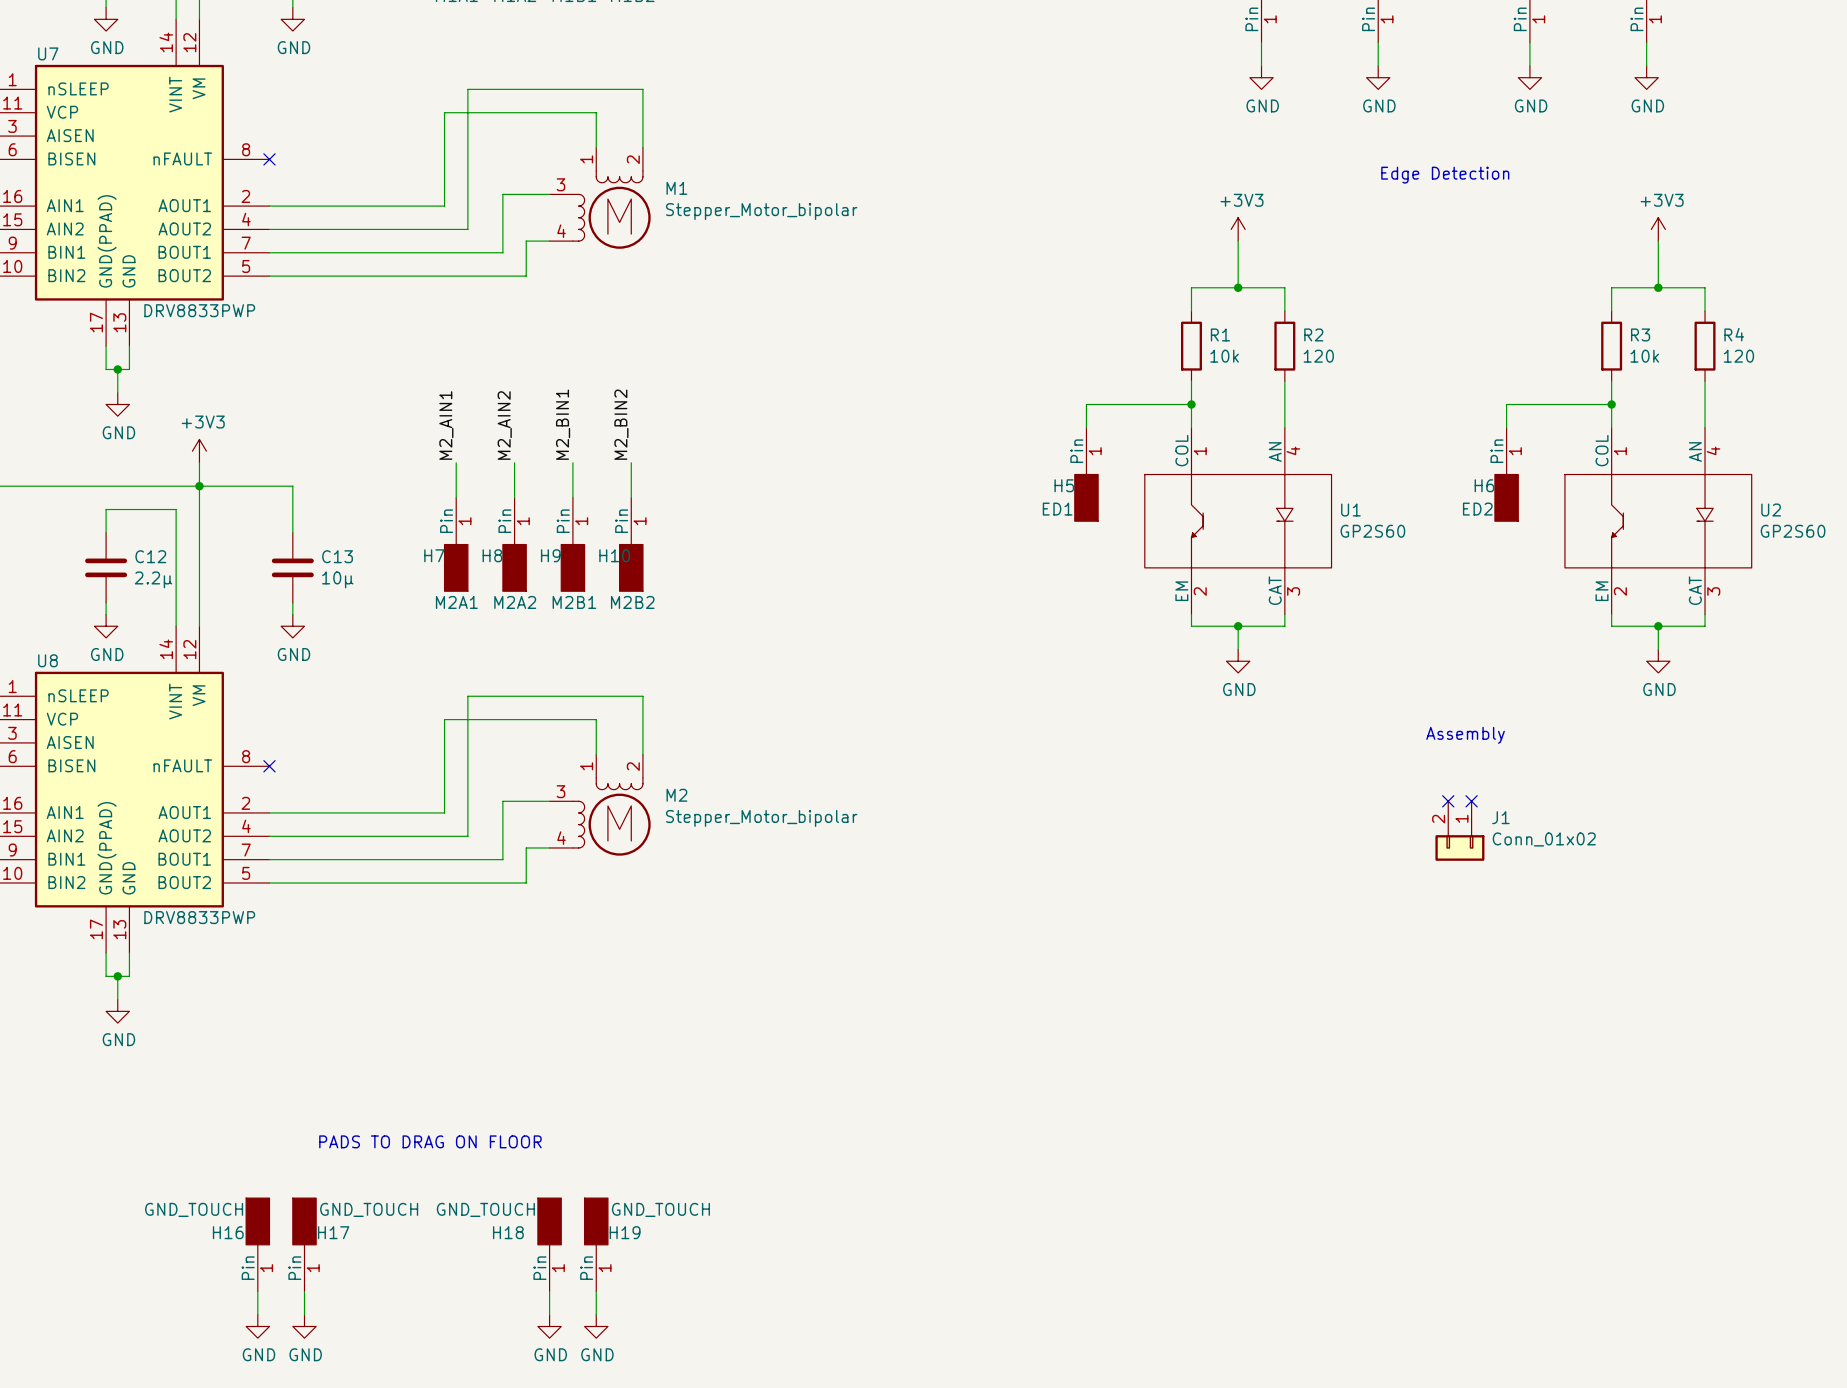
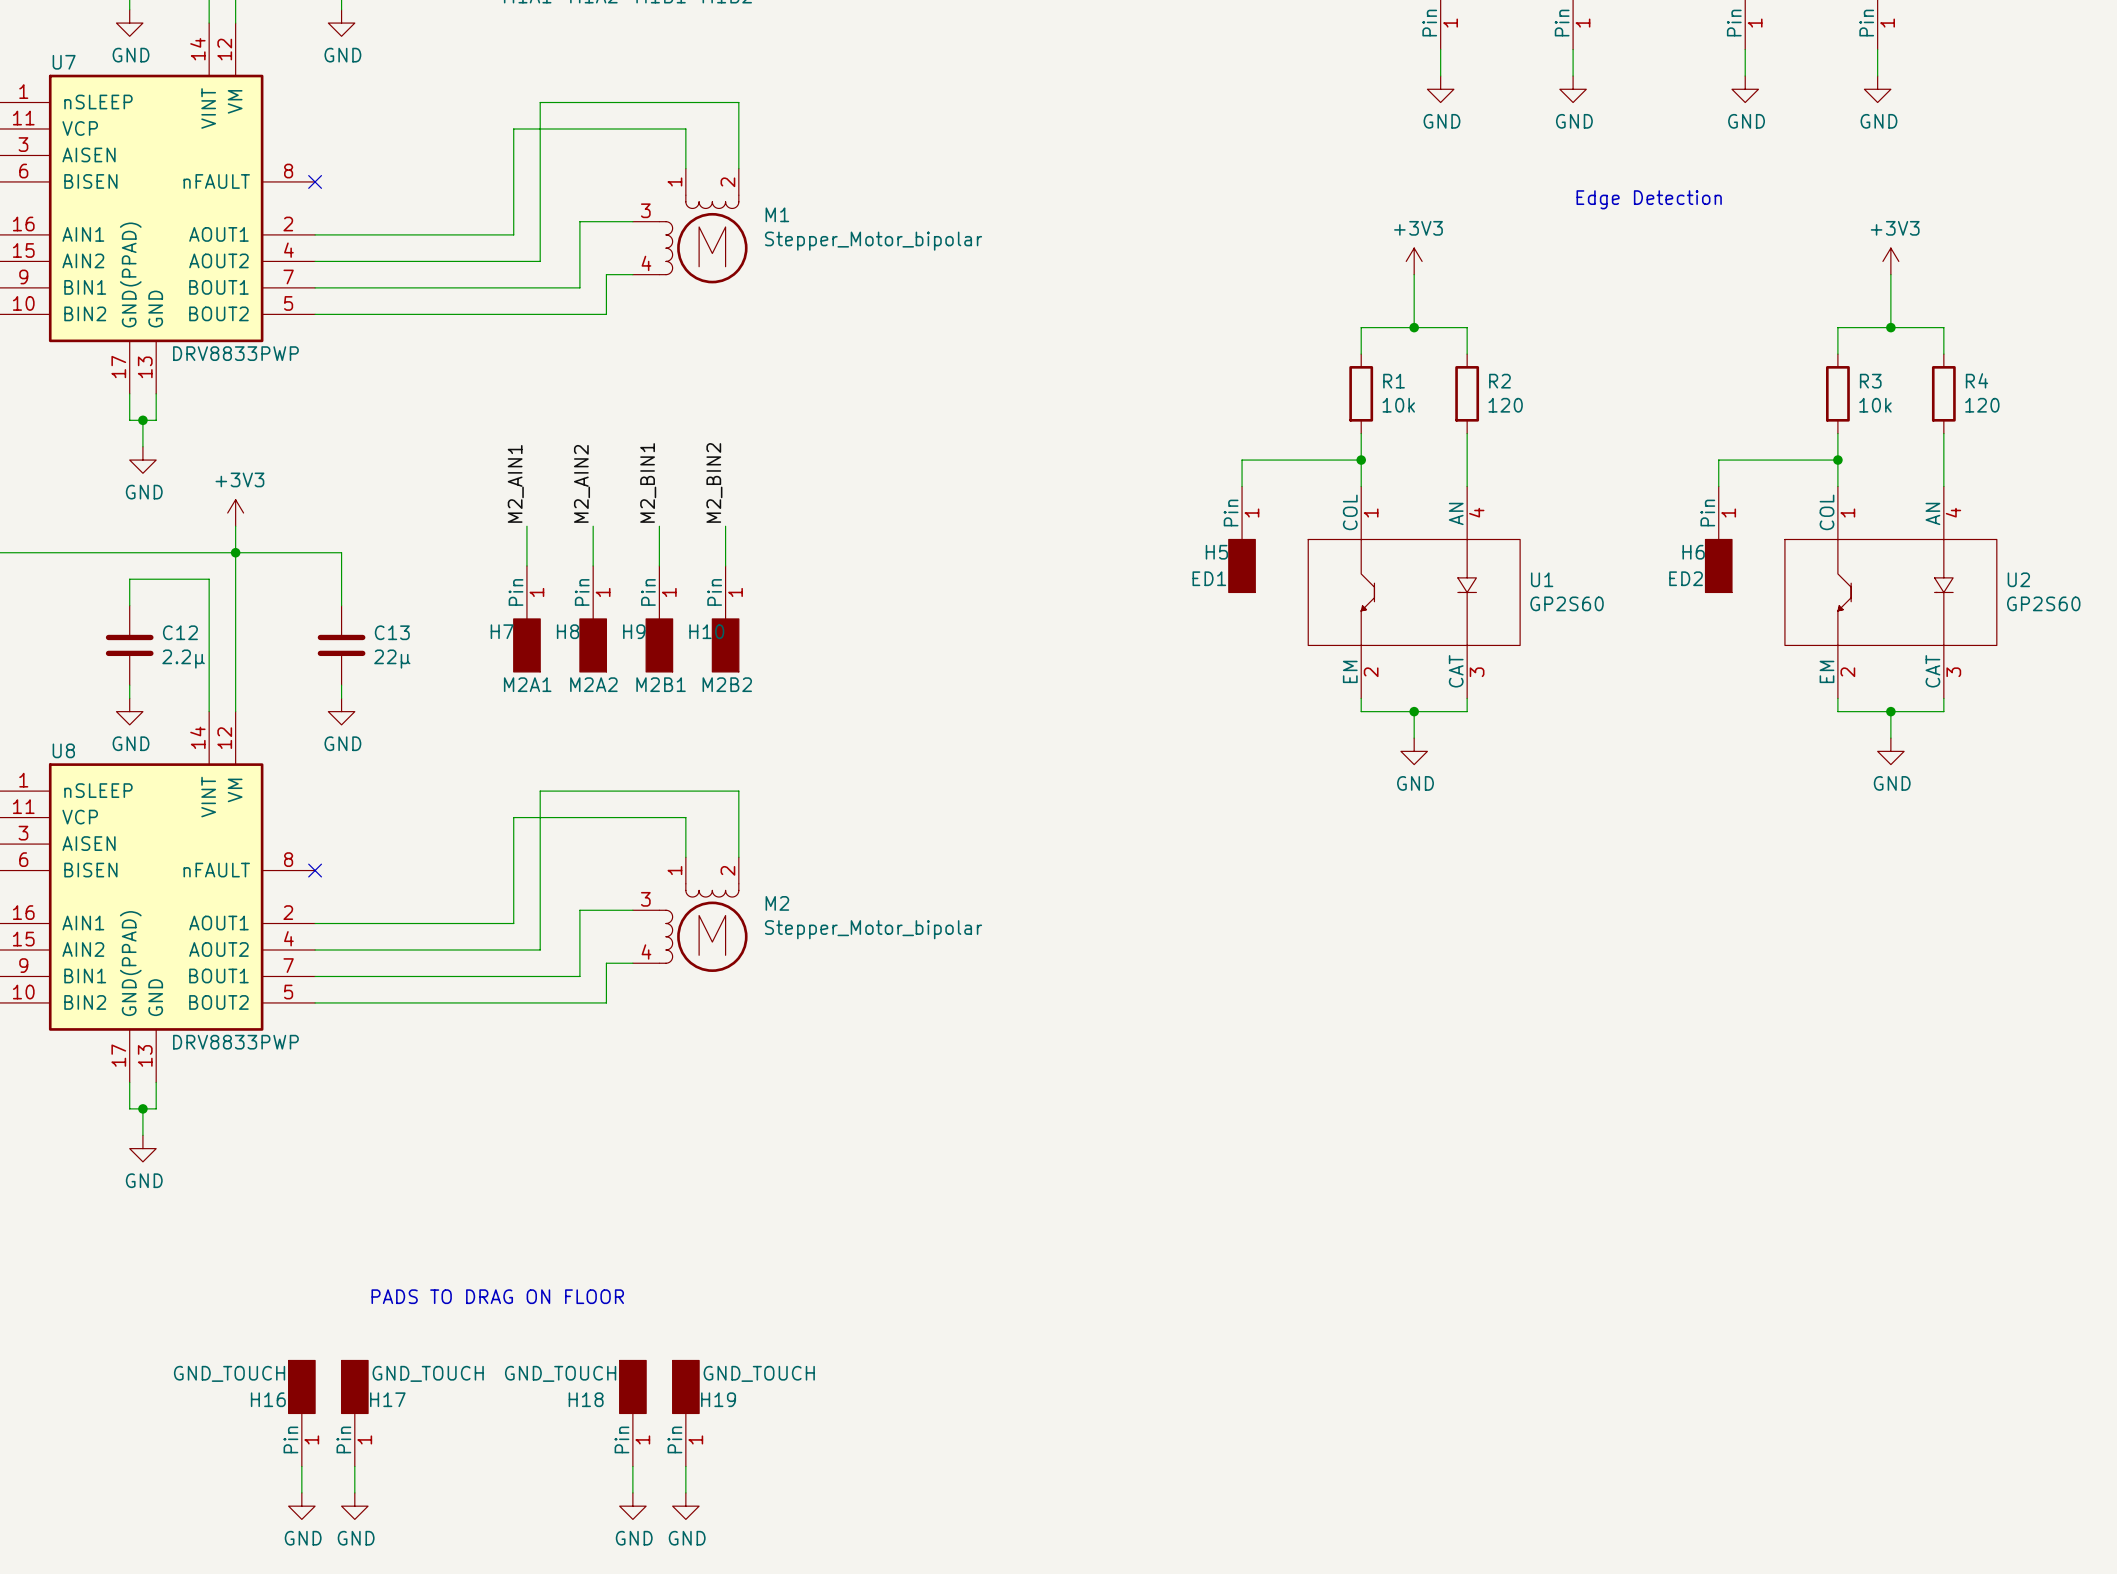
C13 value: 10µ (337, 579) -> 22µ (392, 659)
text: Assembly (1465, 735) -> none
no-connect mark: (1448, 801) -> none
no-connect mark: (1471, 801) -> none
J1: Conn_01x02 (1459, 831) -> none

